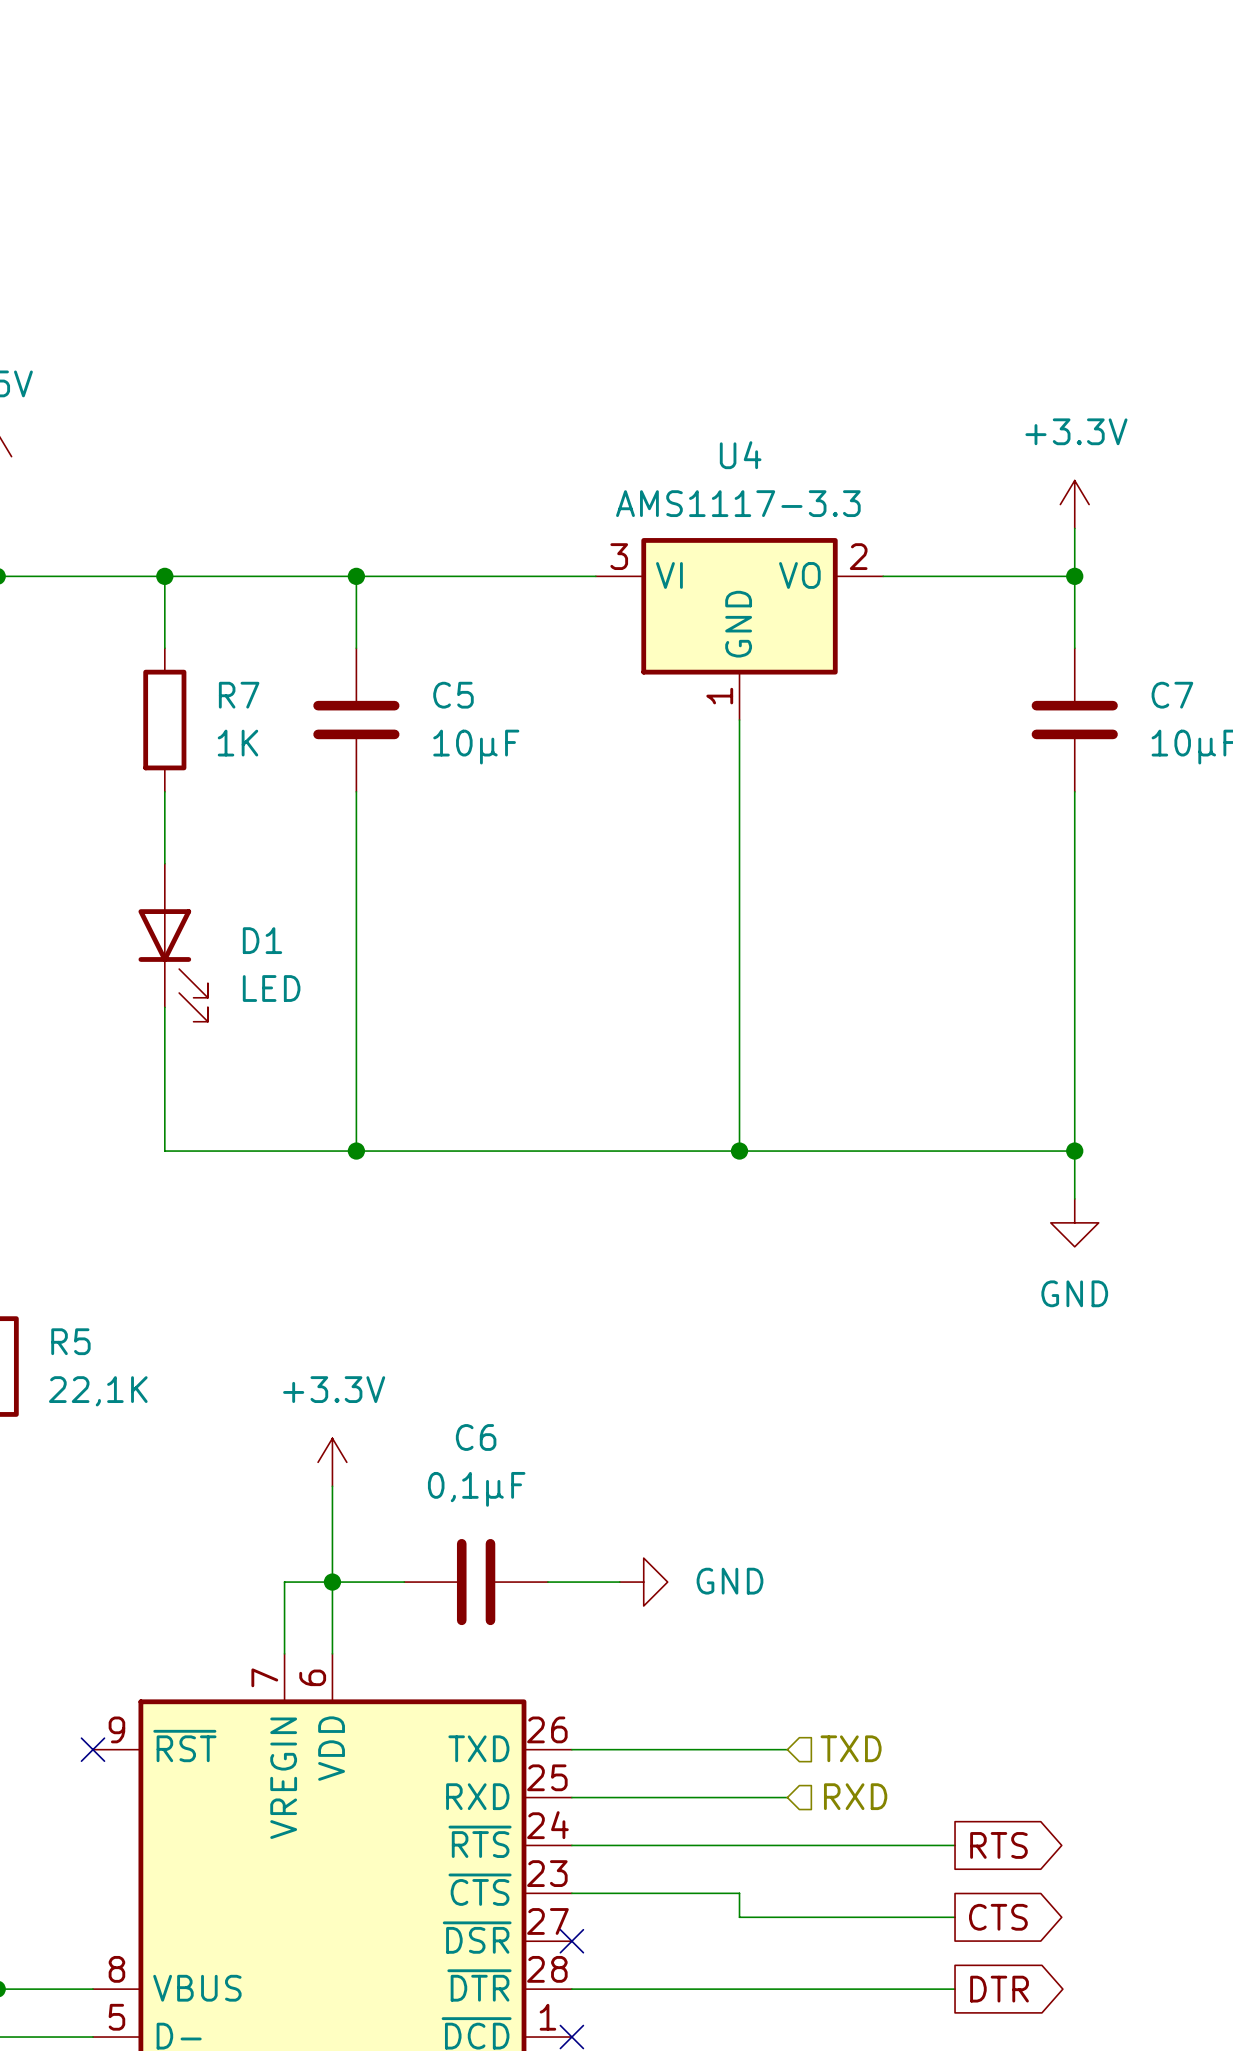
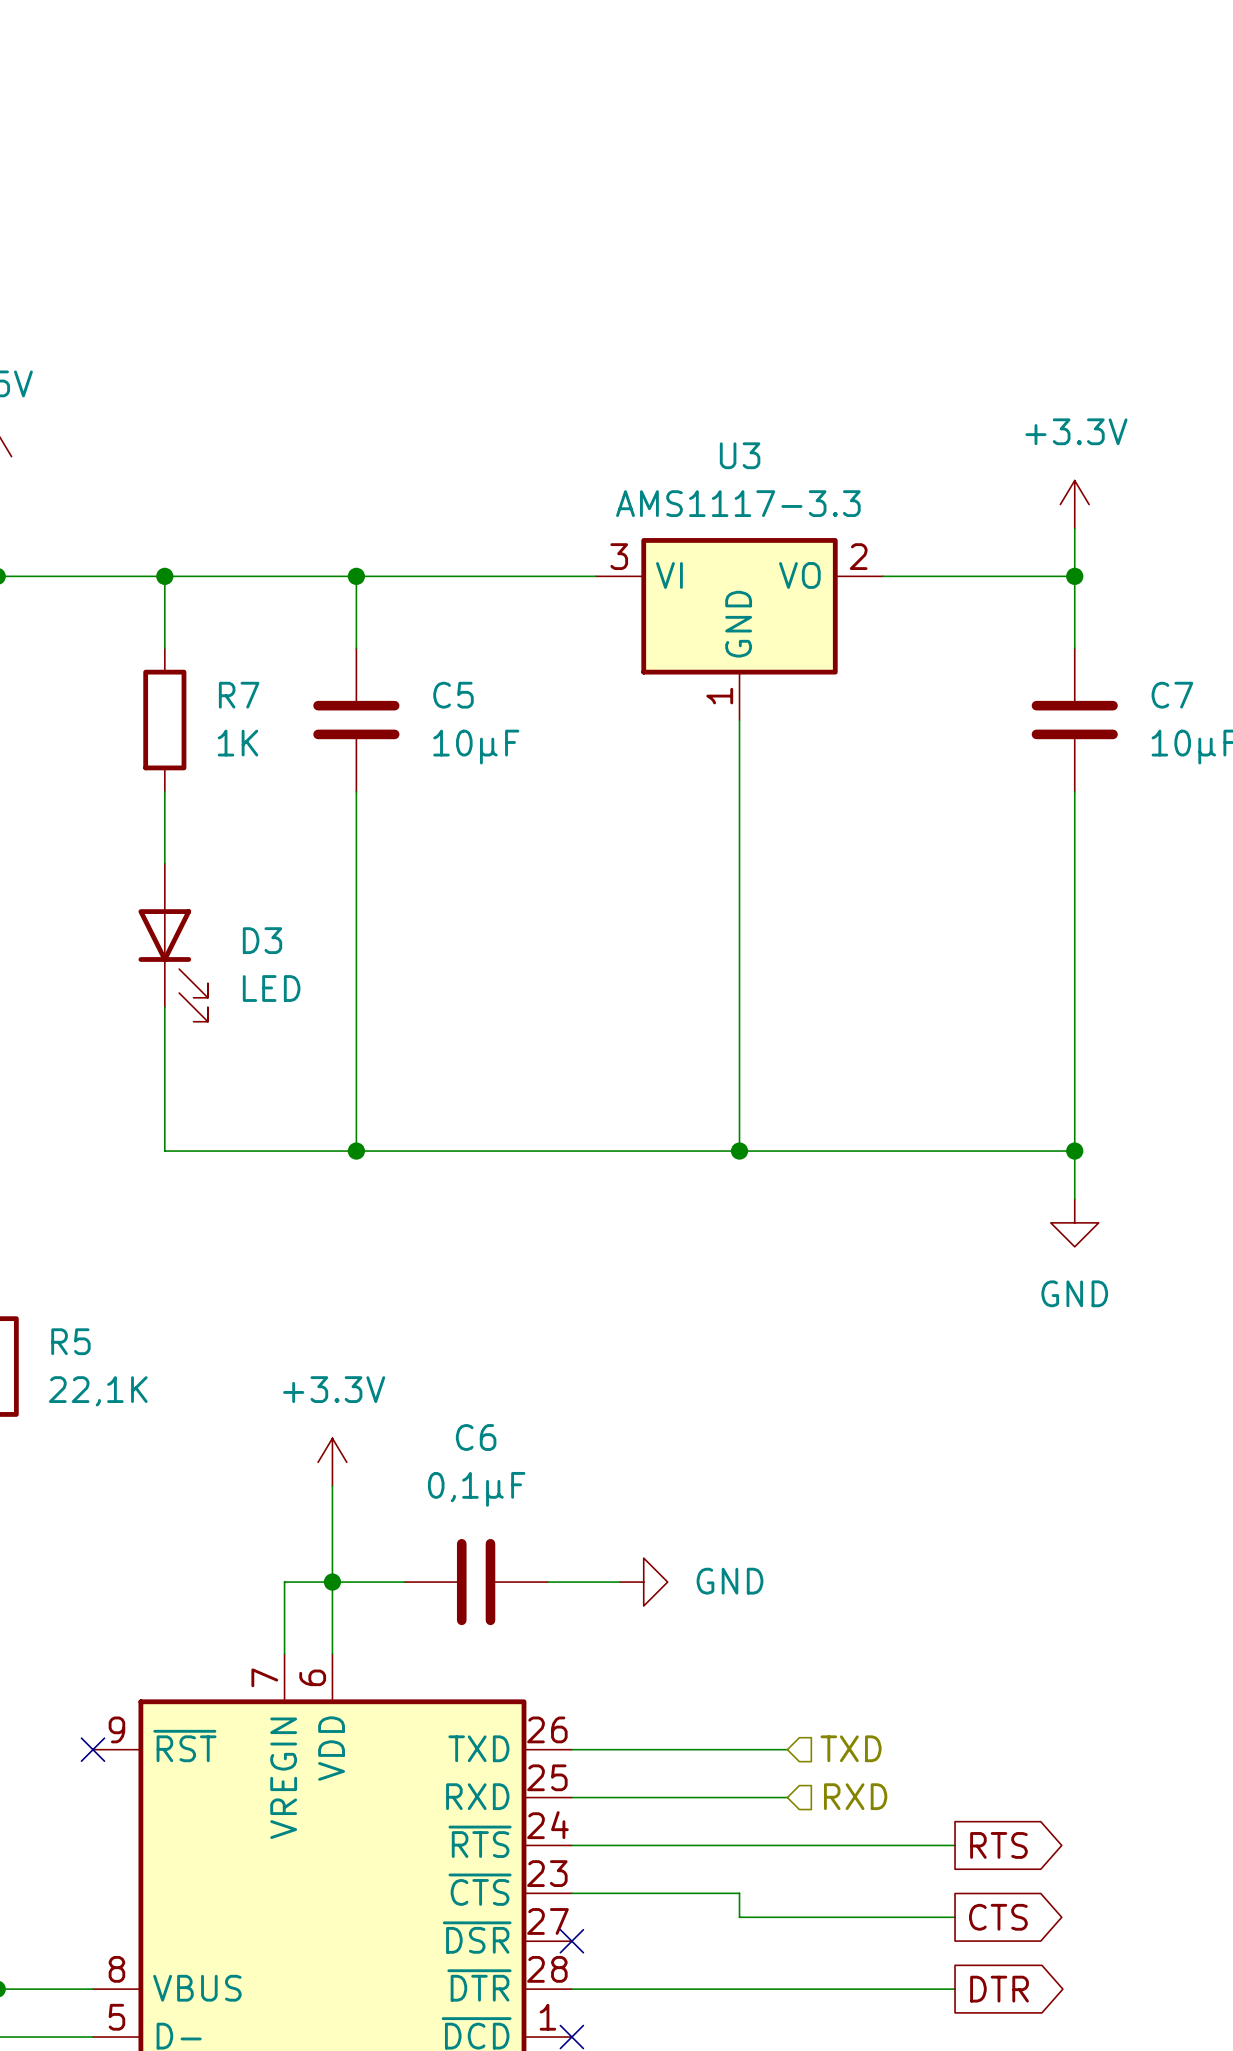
U4 name: U4 (740, 455) -> U3 (740, 455)
D1 name: D1 (262, 940) -> D3 (262, 940)

